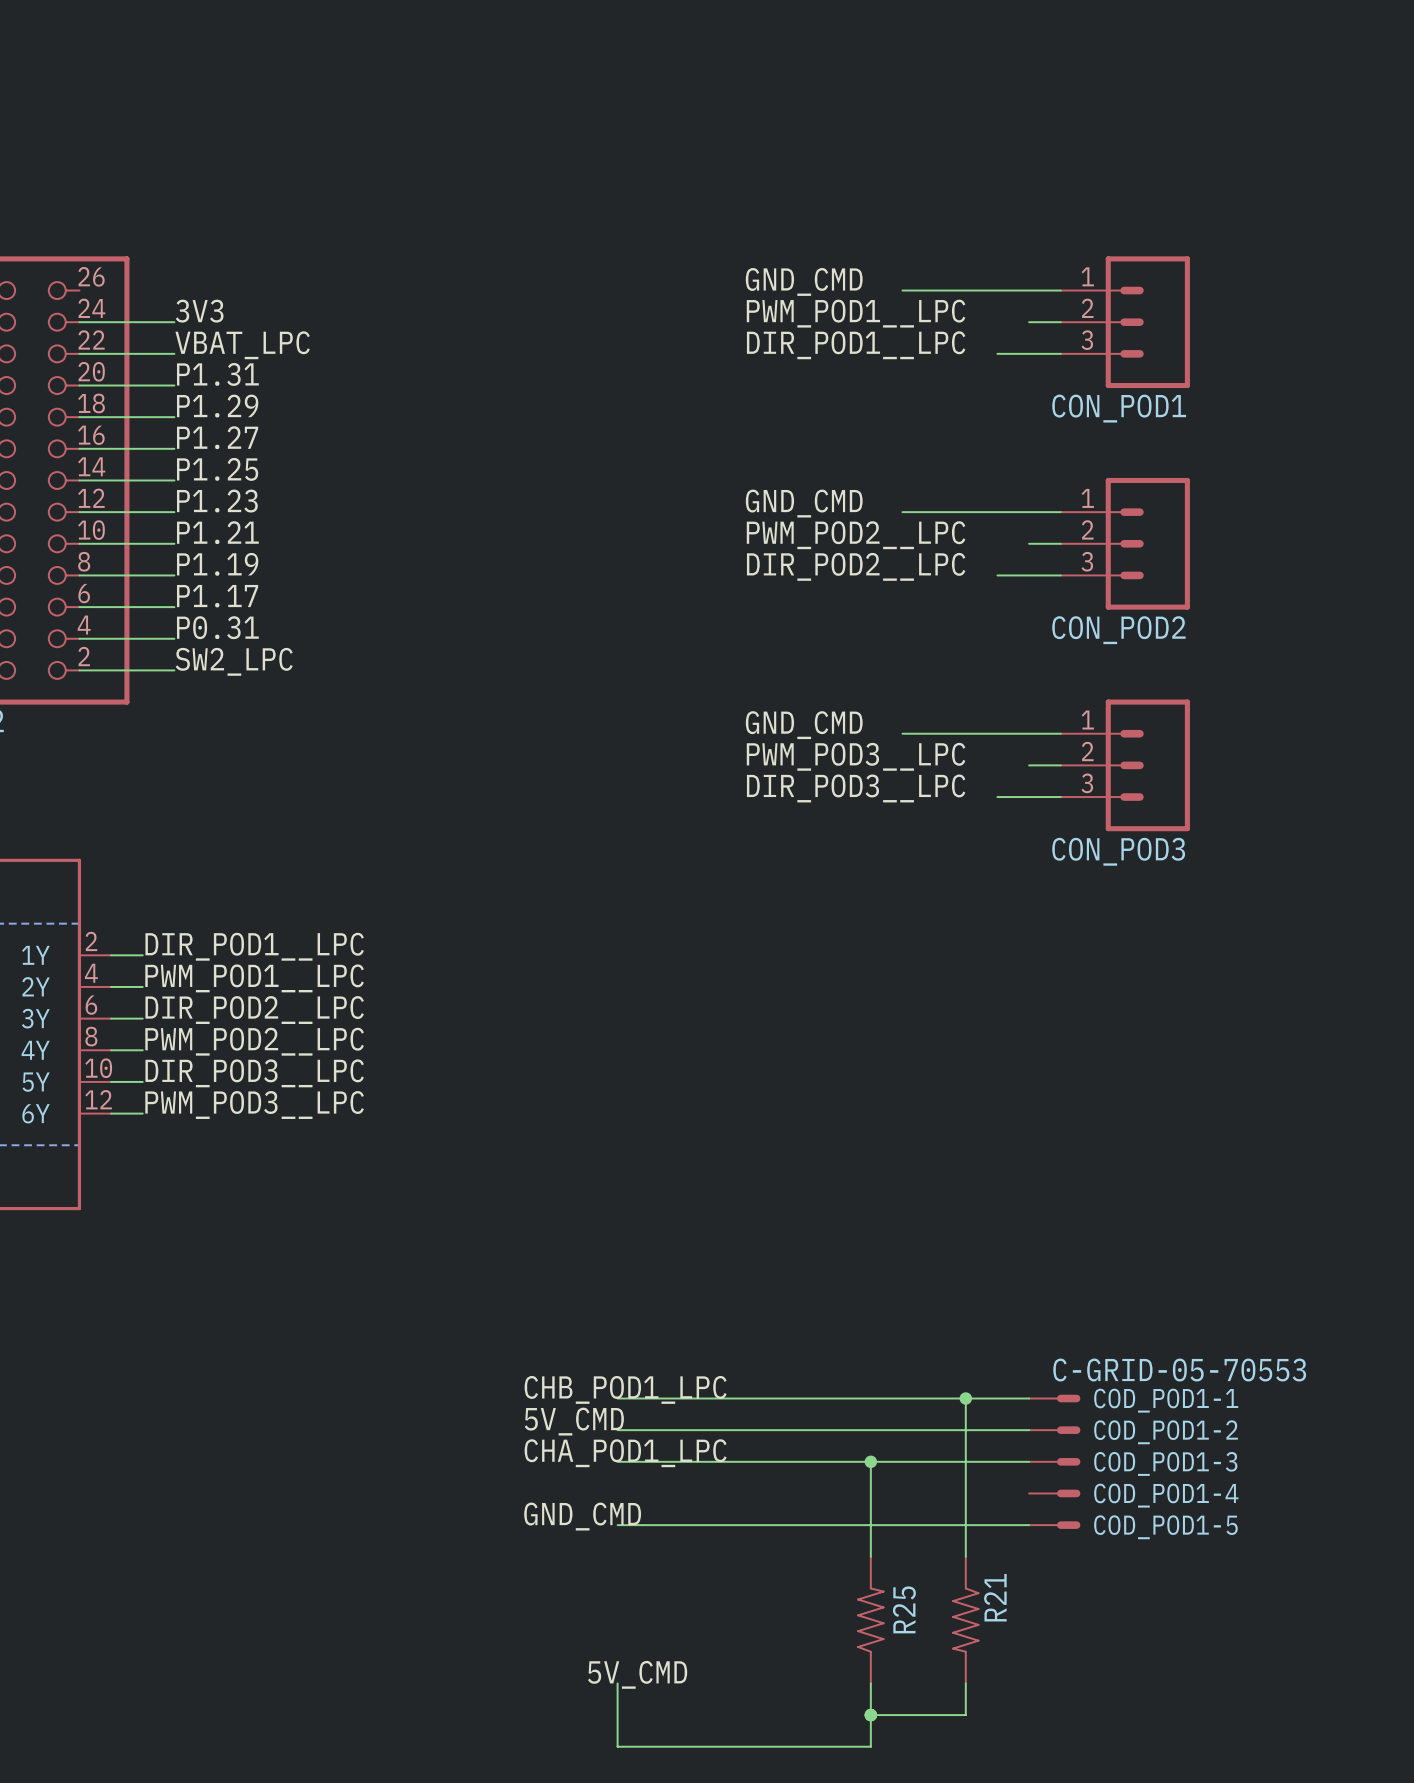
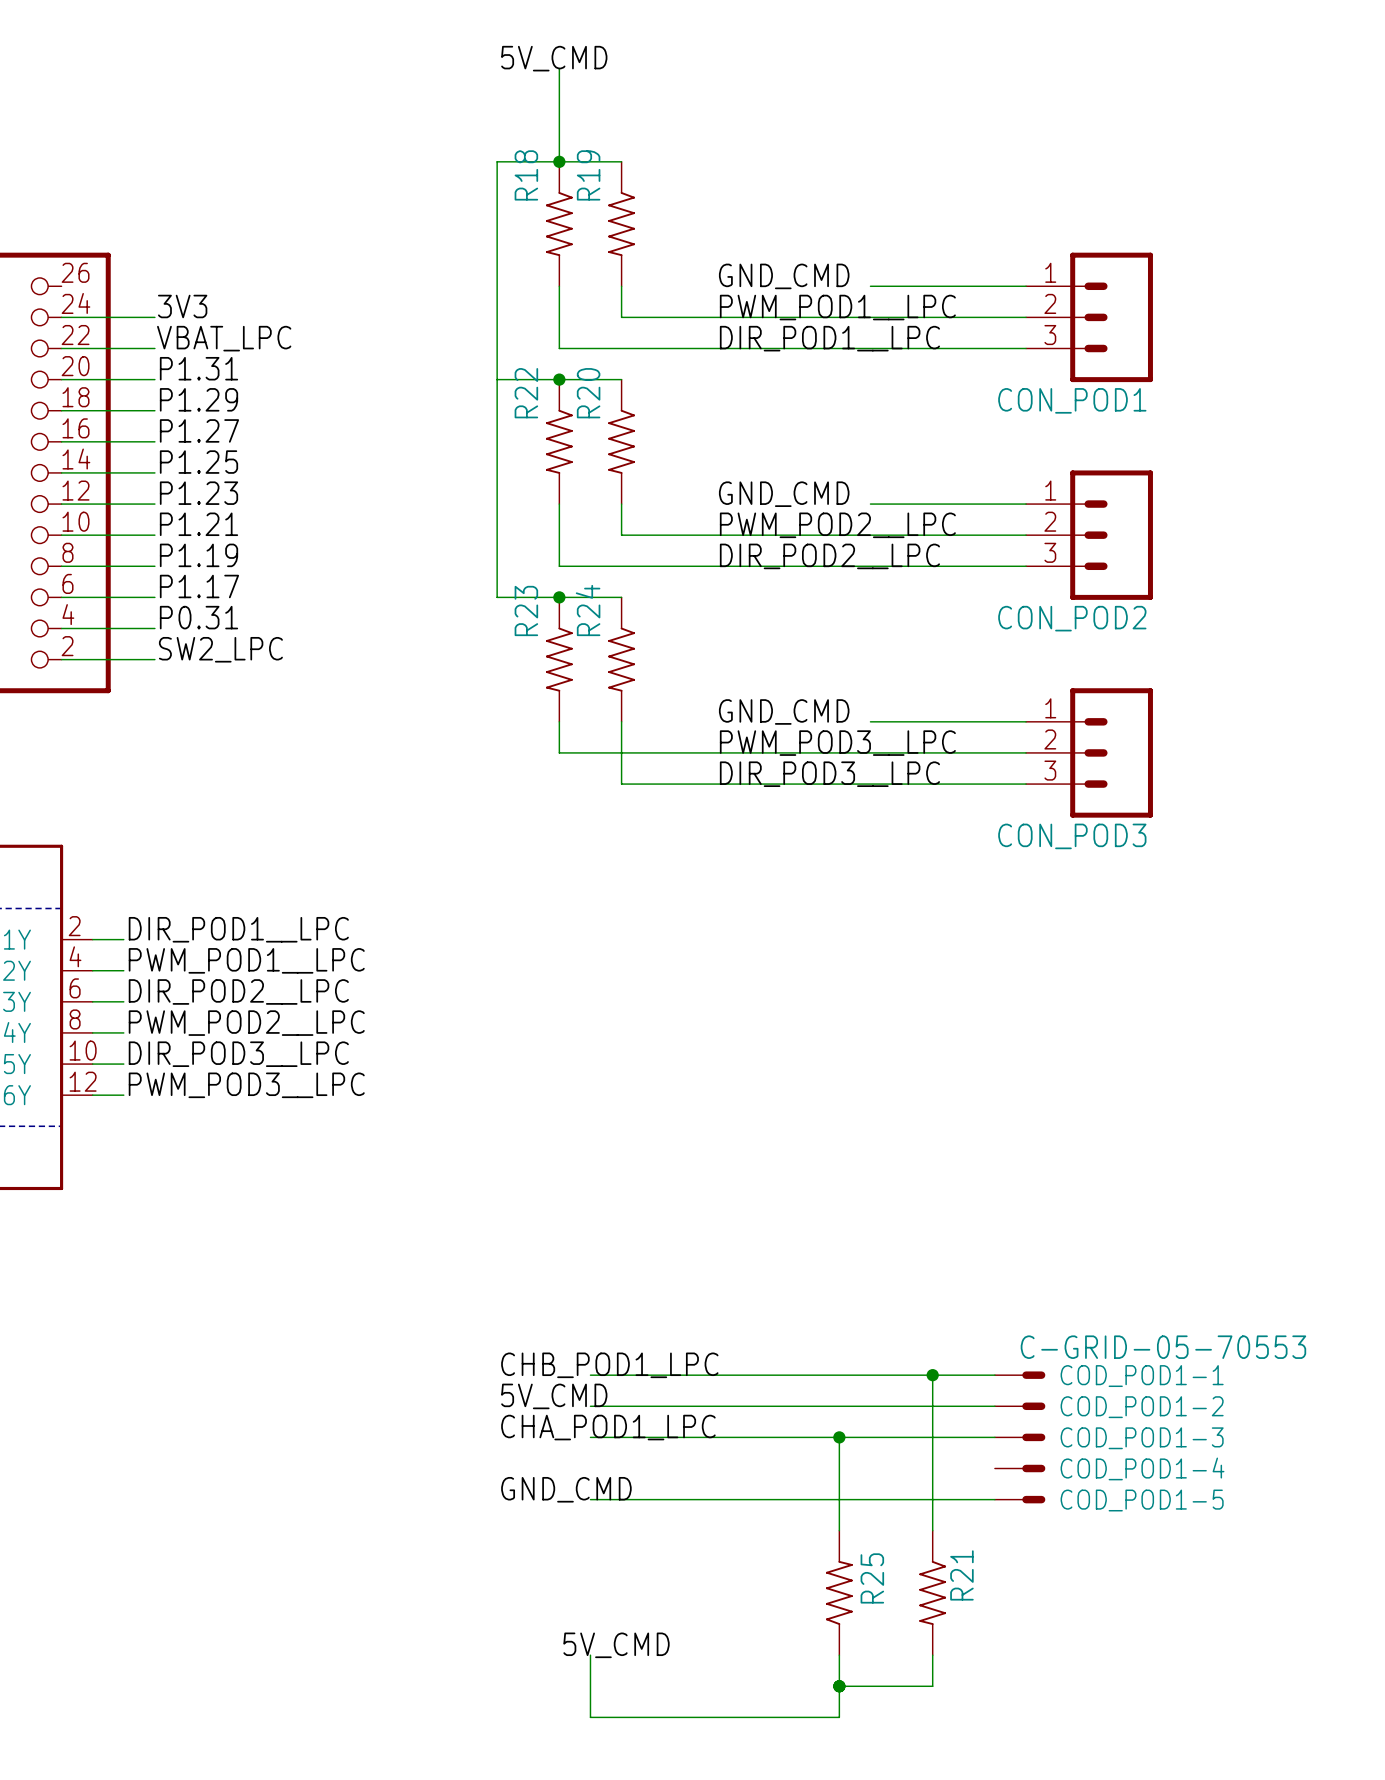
label: none -> 5V_CMD (554, 58)
wire: none -> (559, 68) (559, 161)
junction: none -> (559, 161)
wire: none -> (621, 161) (497, 161) (497, 597) (621, 597)
R18: none -> (559, 224)
R19: none -> (621, 224)
wire: none -> (559, 286) (559, 348) (963, 348)
wire: none -> (621, 286) (621, 317) (994, 317)
wire: none -> (497, 379) (621, 379)
junction: none -> (559, 379)
R22: none -> (559, 441)
R20: none -> (621, 441)
wire: none -> (559, 504) (559, 566) (963, 566)
wire: none -> (621, 504) (621, 535) (994, 535)
junction: none -> (559, 597)
R23: none -> (559, 659)
R24: none -> (621, 659)
wire: none -> (559, 721) (559, 752) (994, 752)
wire: none -> (621, 721) (621, 784) (963, 784)

